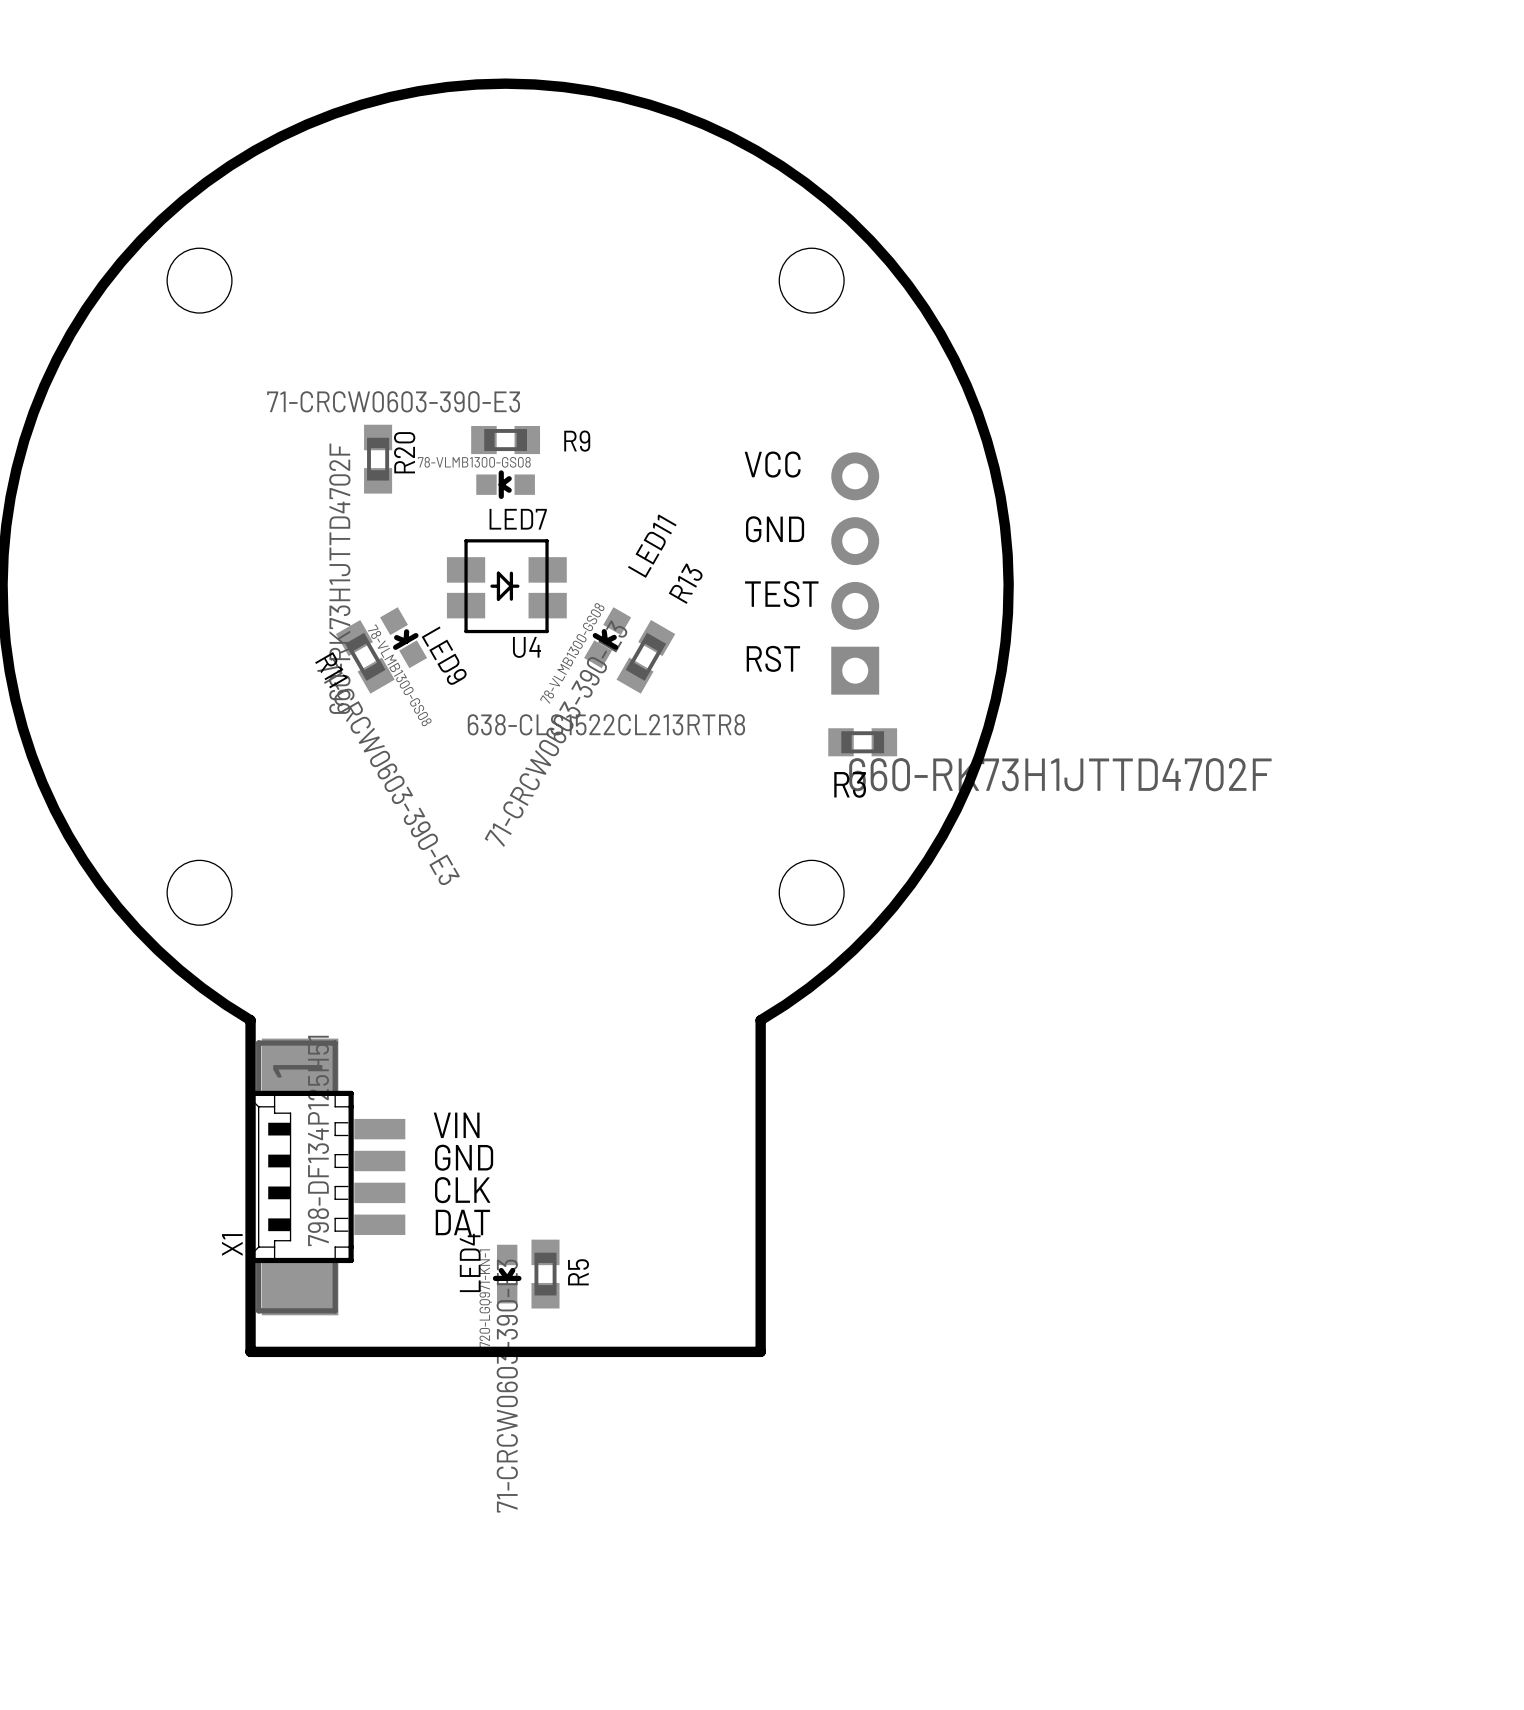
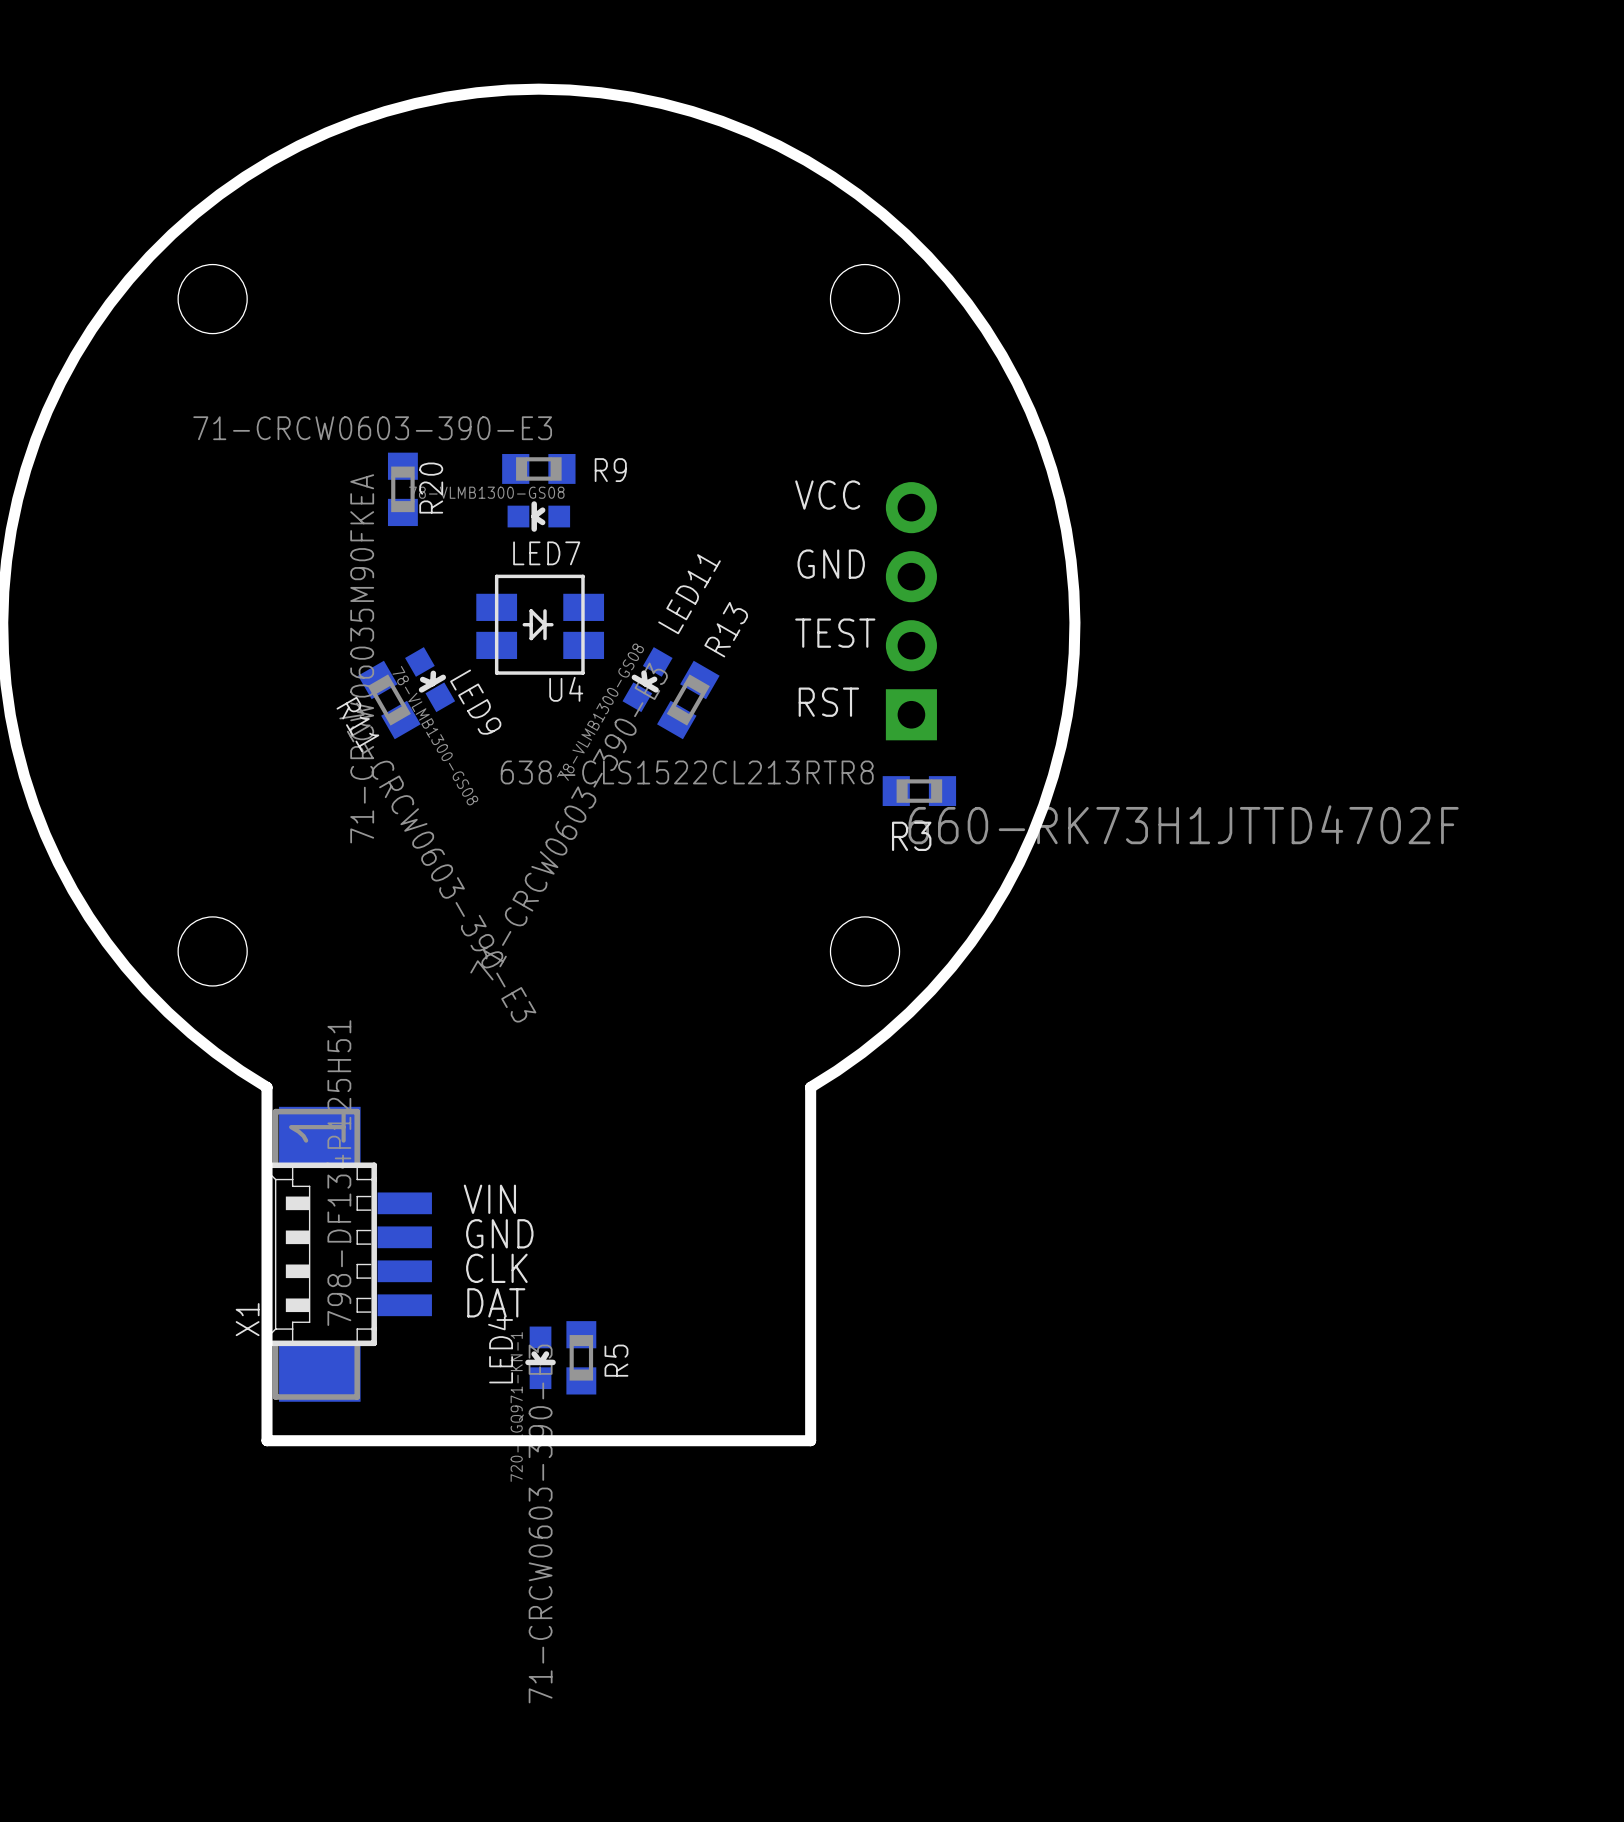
R20 value: 660-RK73H1JTTD4702F (339, 578) -> 71-CRCW06035M90FKEA (362, 658)

